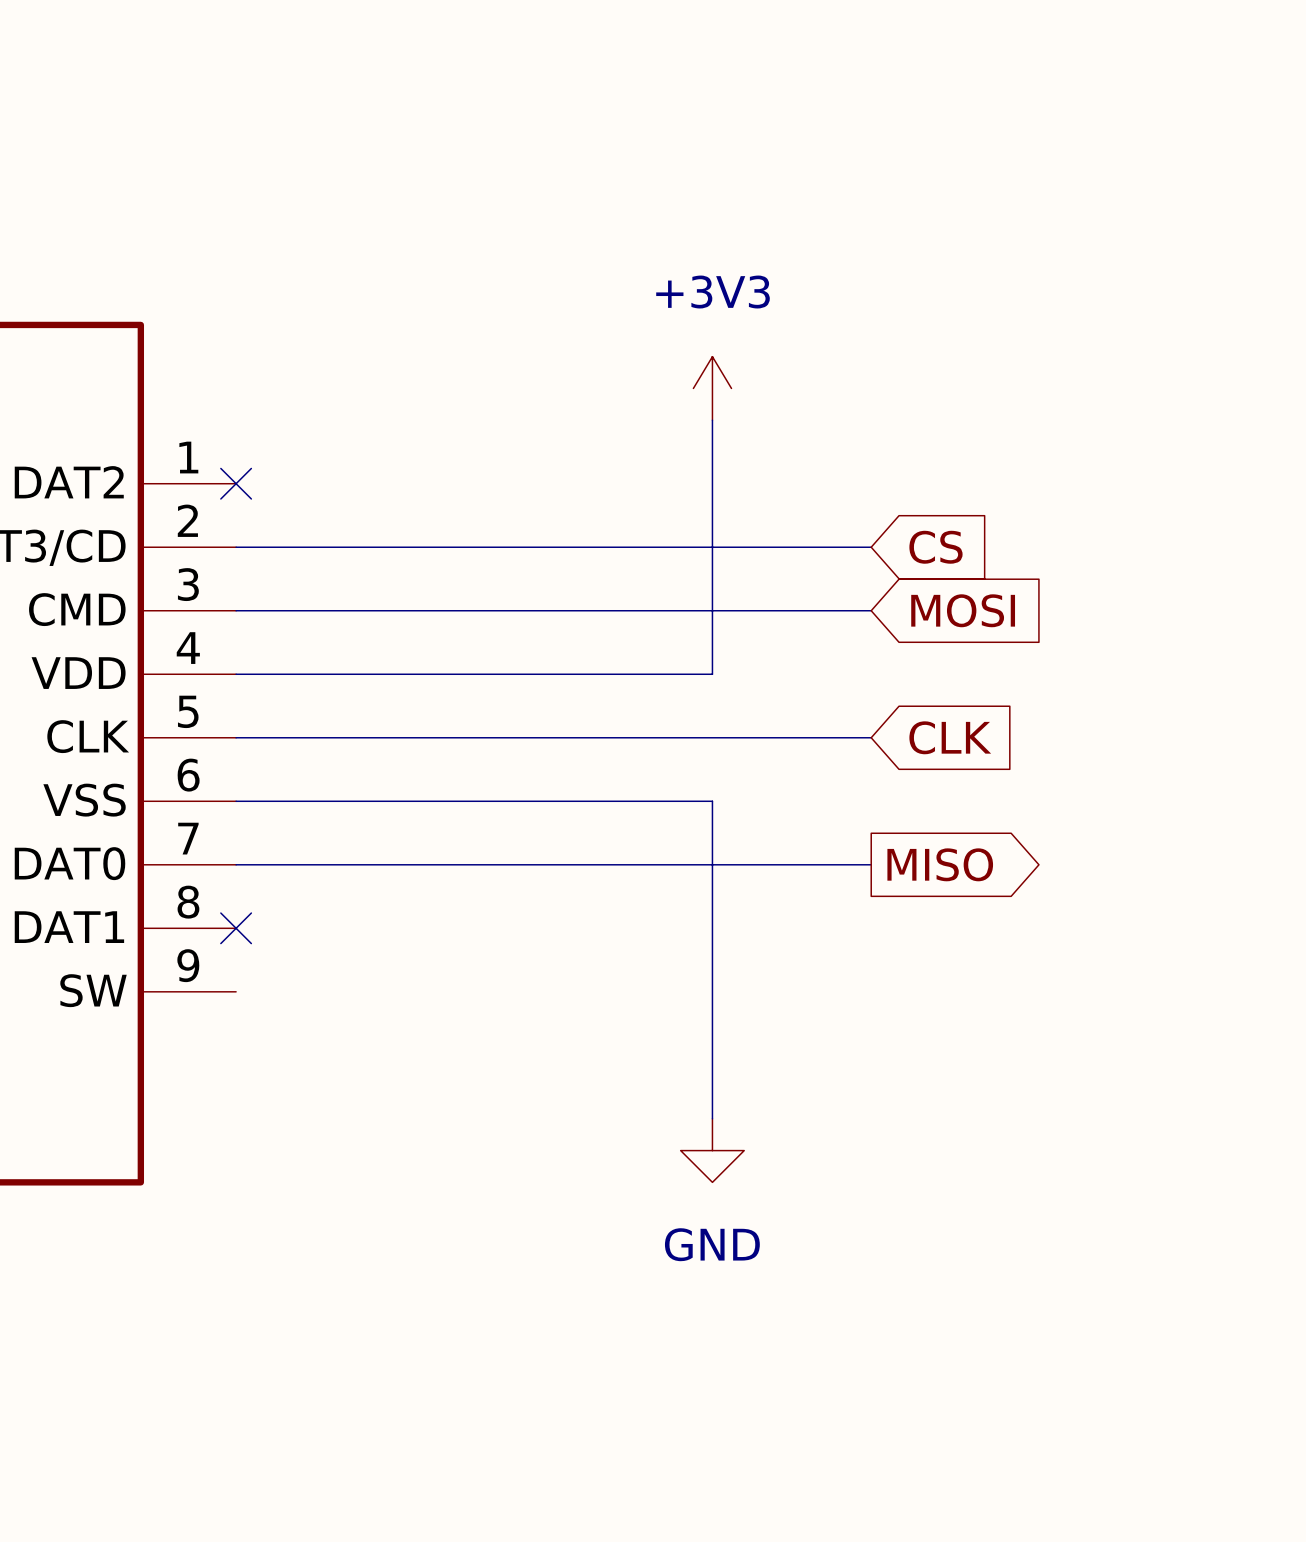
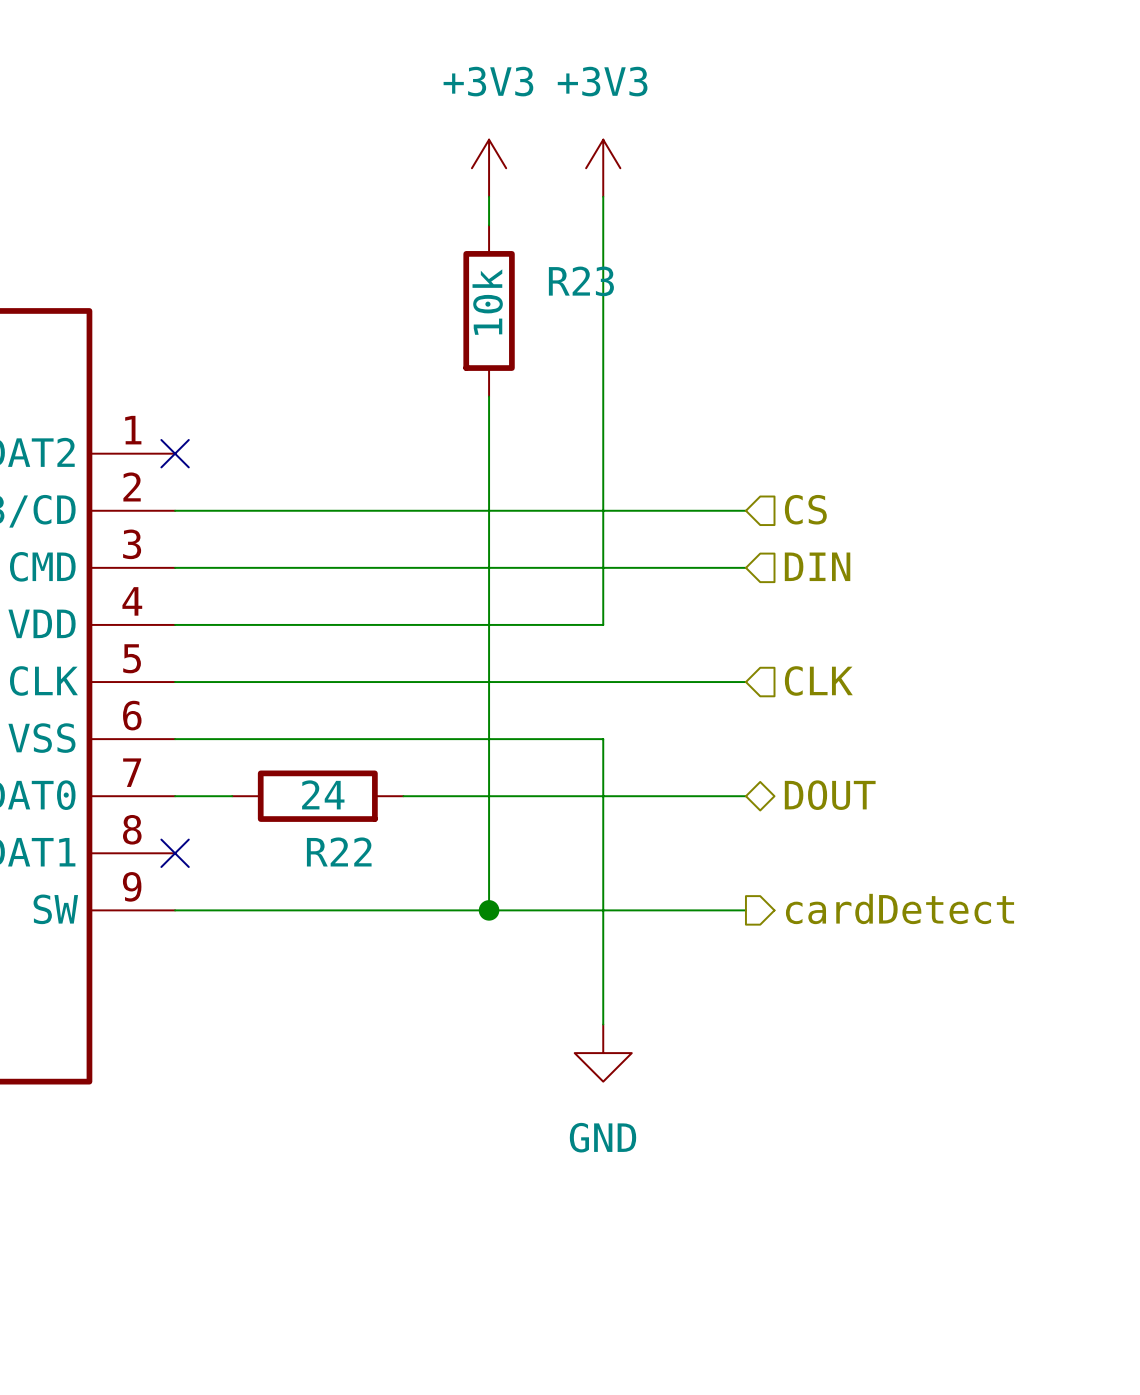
power symbol: none -> +3V3 (489, 168)
power symbol: none -> +3V3 (603, 168)
wire: none -> (489, 196) (489, 225)
wire: none -> (603, 196) (603, 396)
R23: none -> 10k (489, 310)
power symbol: +3V3 (712, 388) -> none
wire: none -> (489, 396) (489, 910)
hierarchical label: none -> CS (805, 509)
global label: CS (935, 547) -> none
hierarchical label: none -> DIN (817, 566)
global label: MOSI (963, 610) -> none
hierarchical label: none -> CLK (818, 680)
global label: CLK (950, 737) -> none
hierarchical label: none -> DOUT (830, 795)
wire: (299, 864) (490, 864) -> none
R22: none -> 24 (317, 796)
global label: MISO (940, 864) -> none
hierarchical label: none -> cardDetect (900, 908)
wire: none -> (175, 910) (745, 910)
junction: none -> (489, 910)

